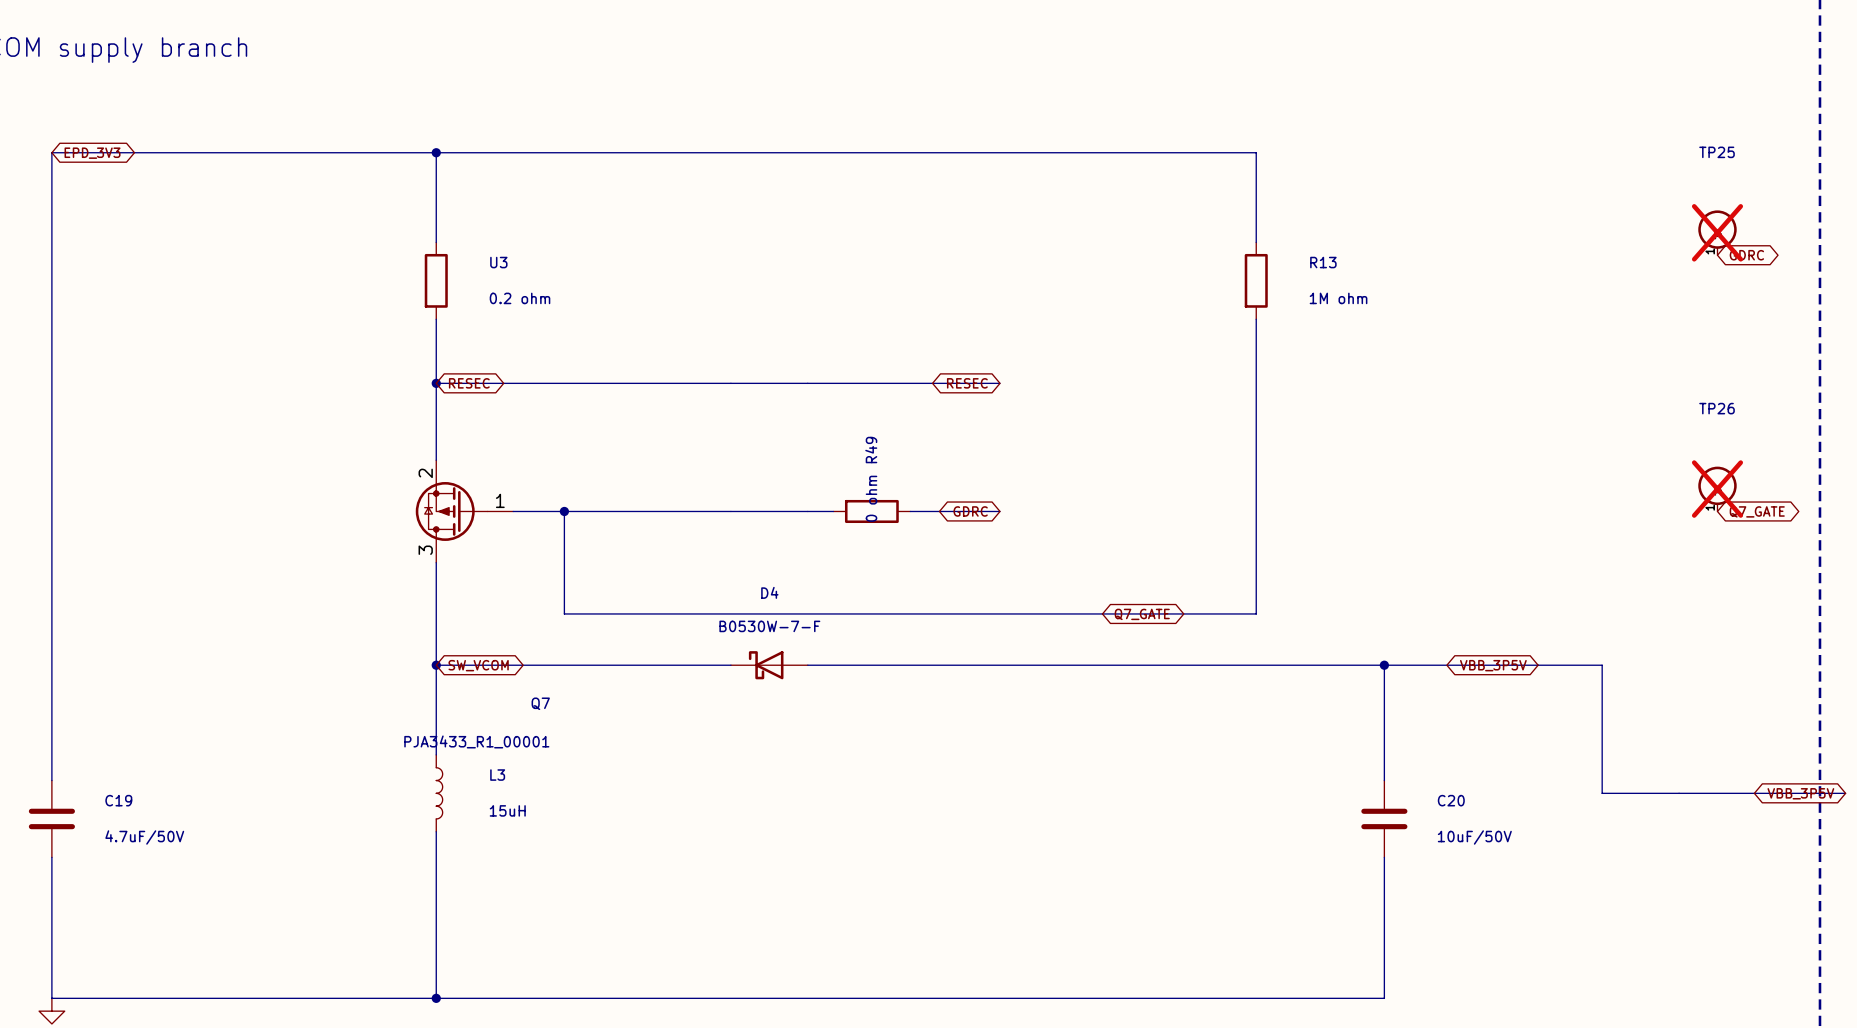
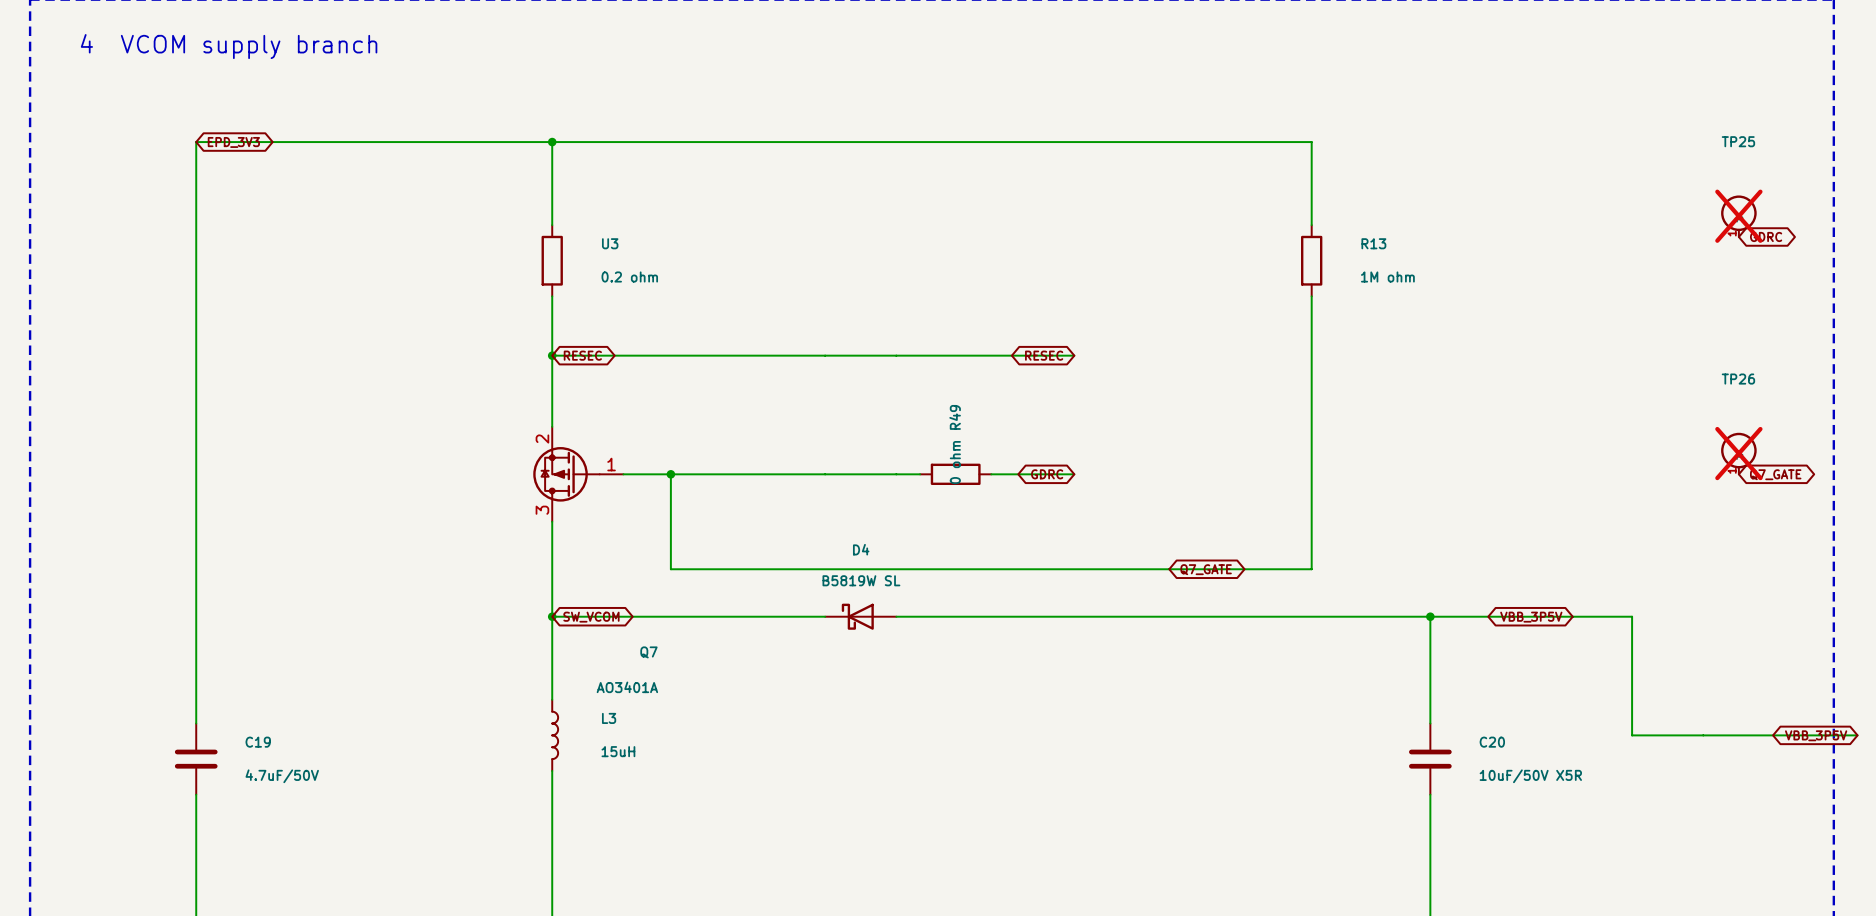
D4 value: B0530W-7-F (769, 626) -> B5819W SL (861, 580)
Q7 value: PJA3433_R1_00001 (476, 741) -> AO3401A (627, 687)
C20 value: 10uF/50V (1474, 837) -> 10uF/50V X5R (1530, 776)

